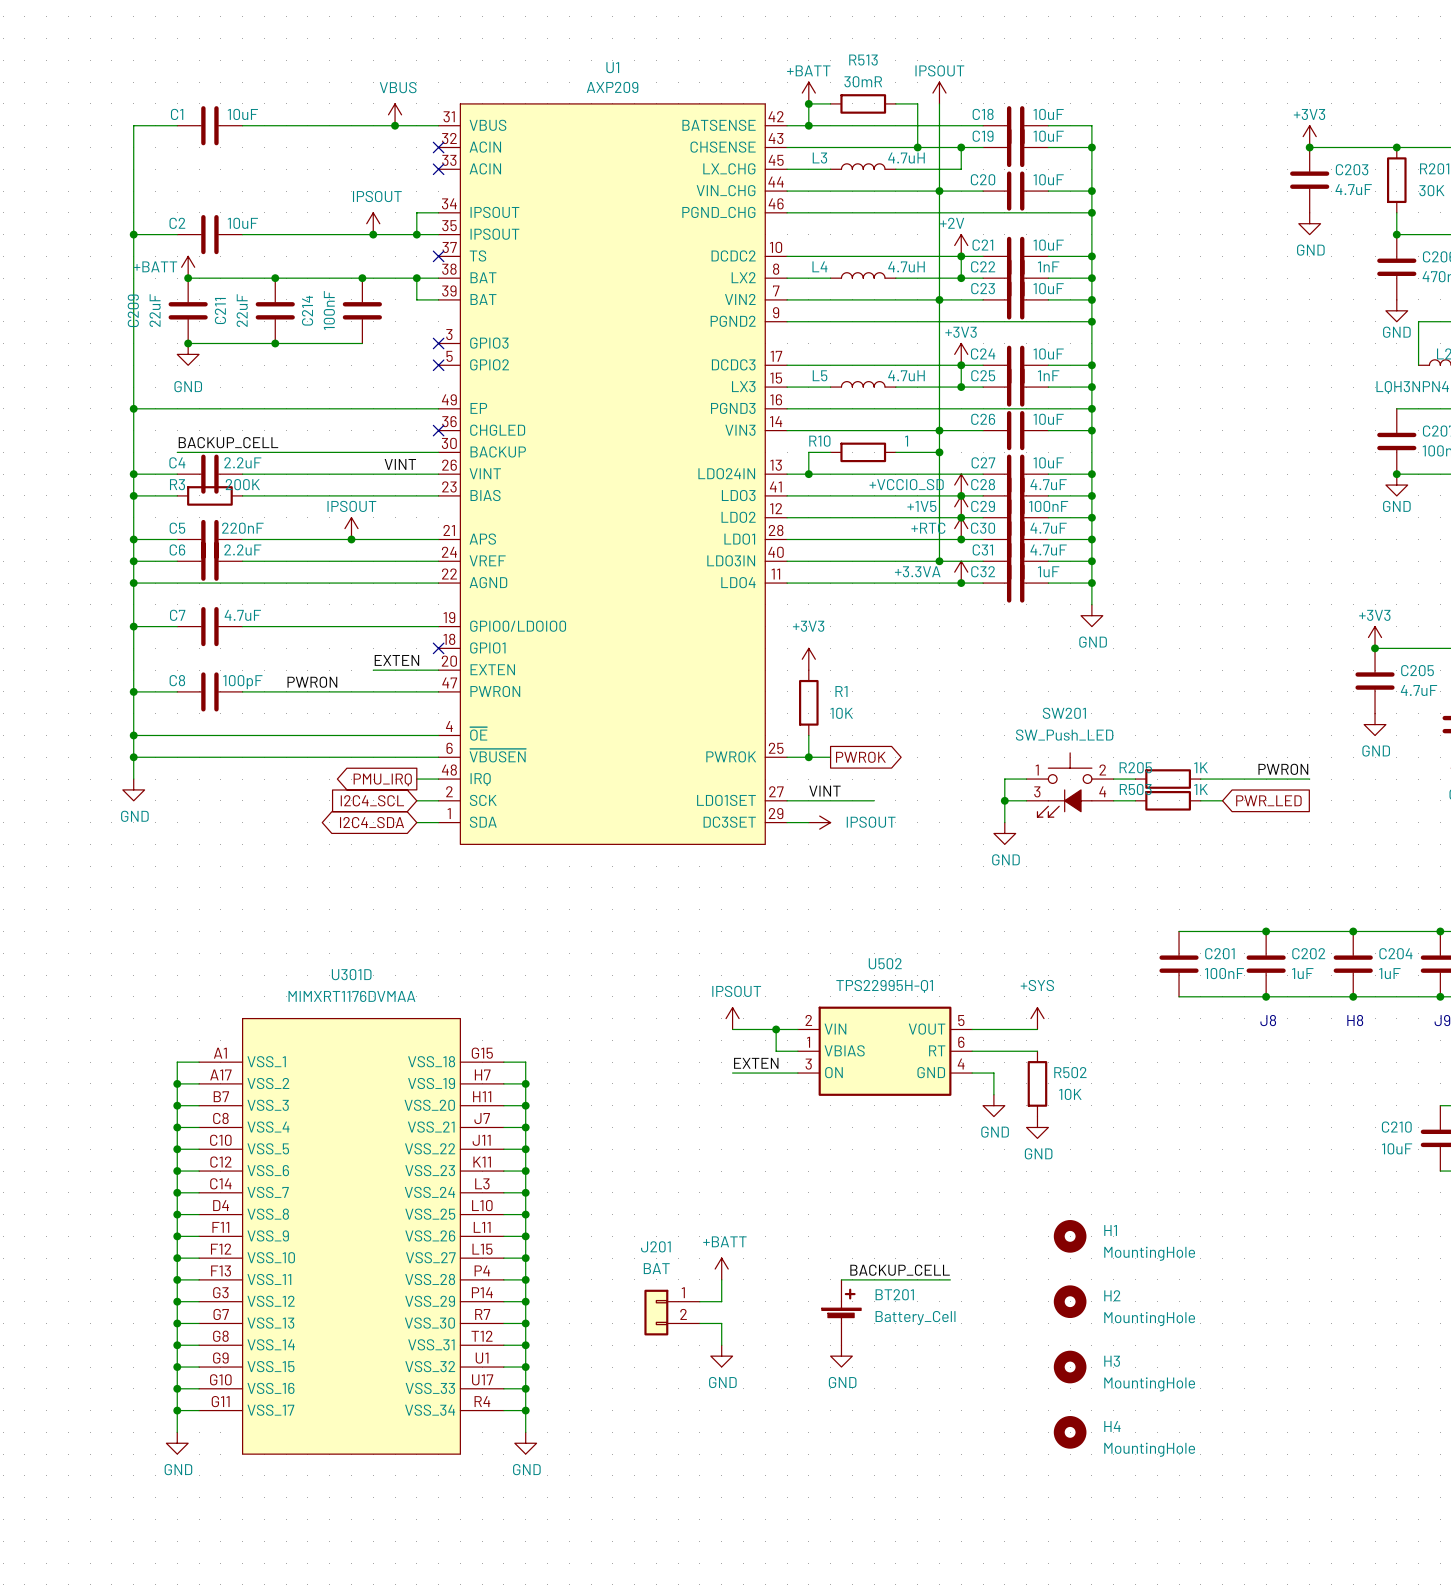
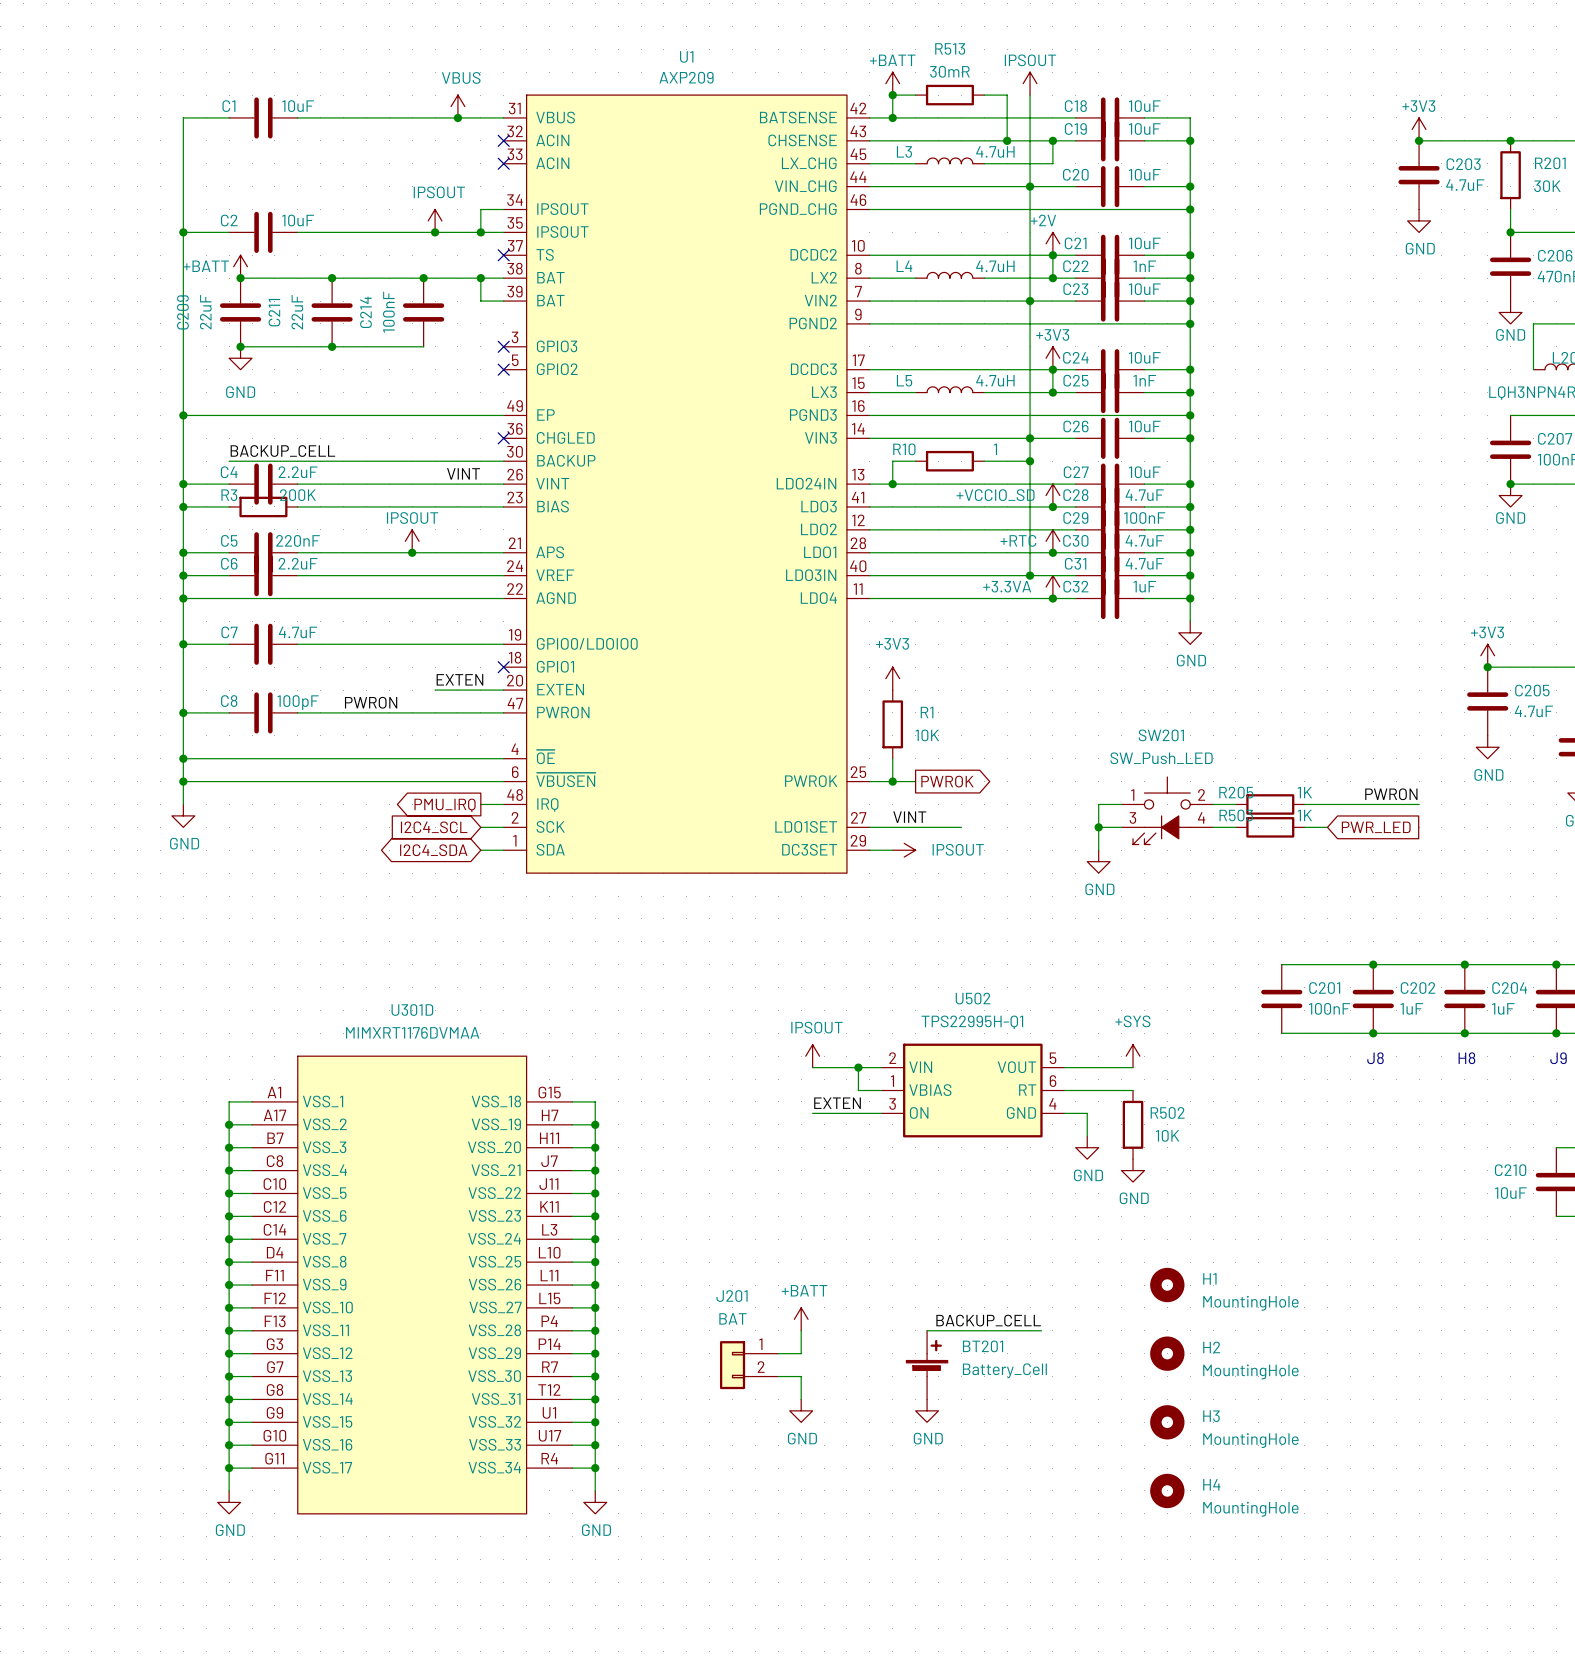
power symbol: +1V5 (961, 506) -> none
junction: (961, 517) -> none

